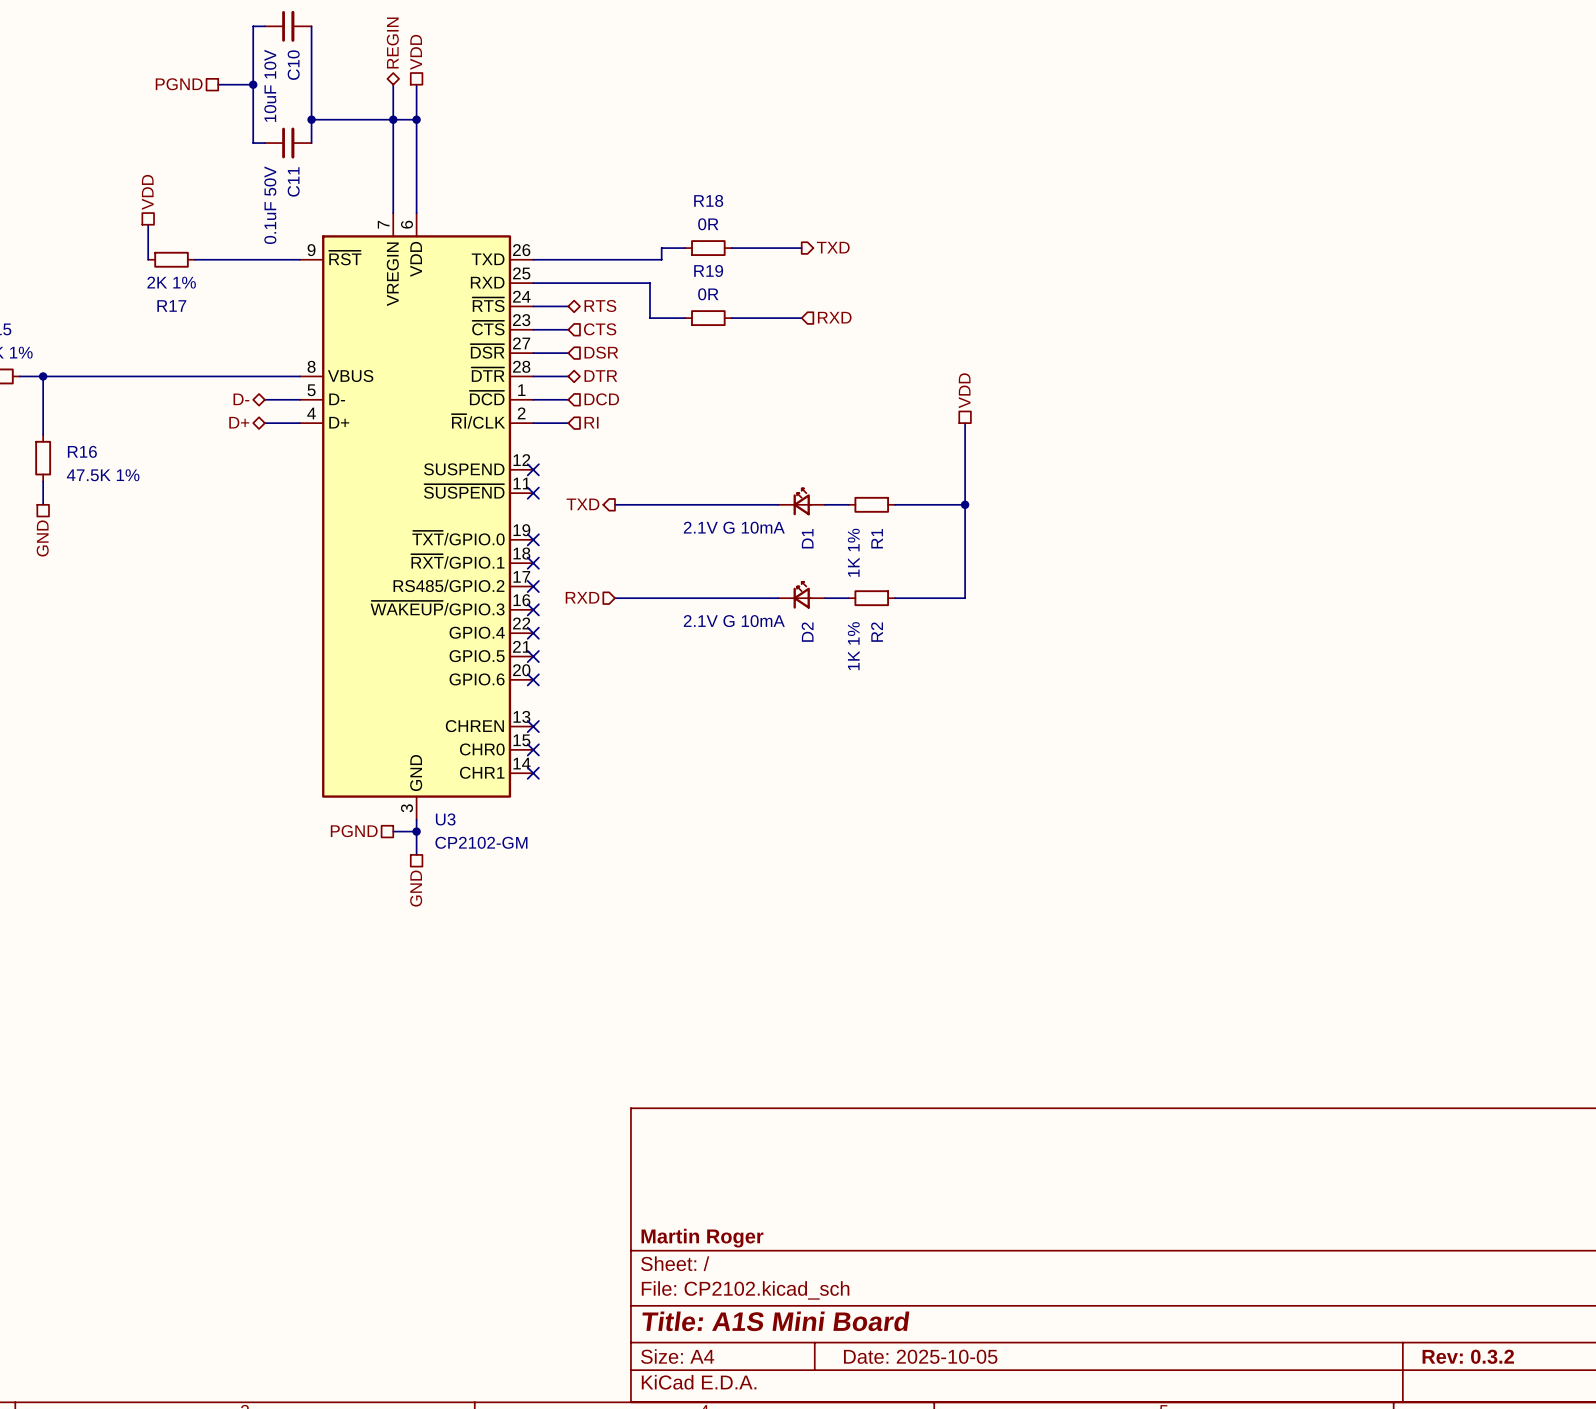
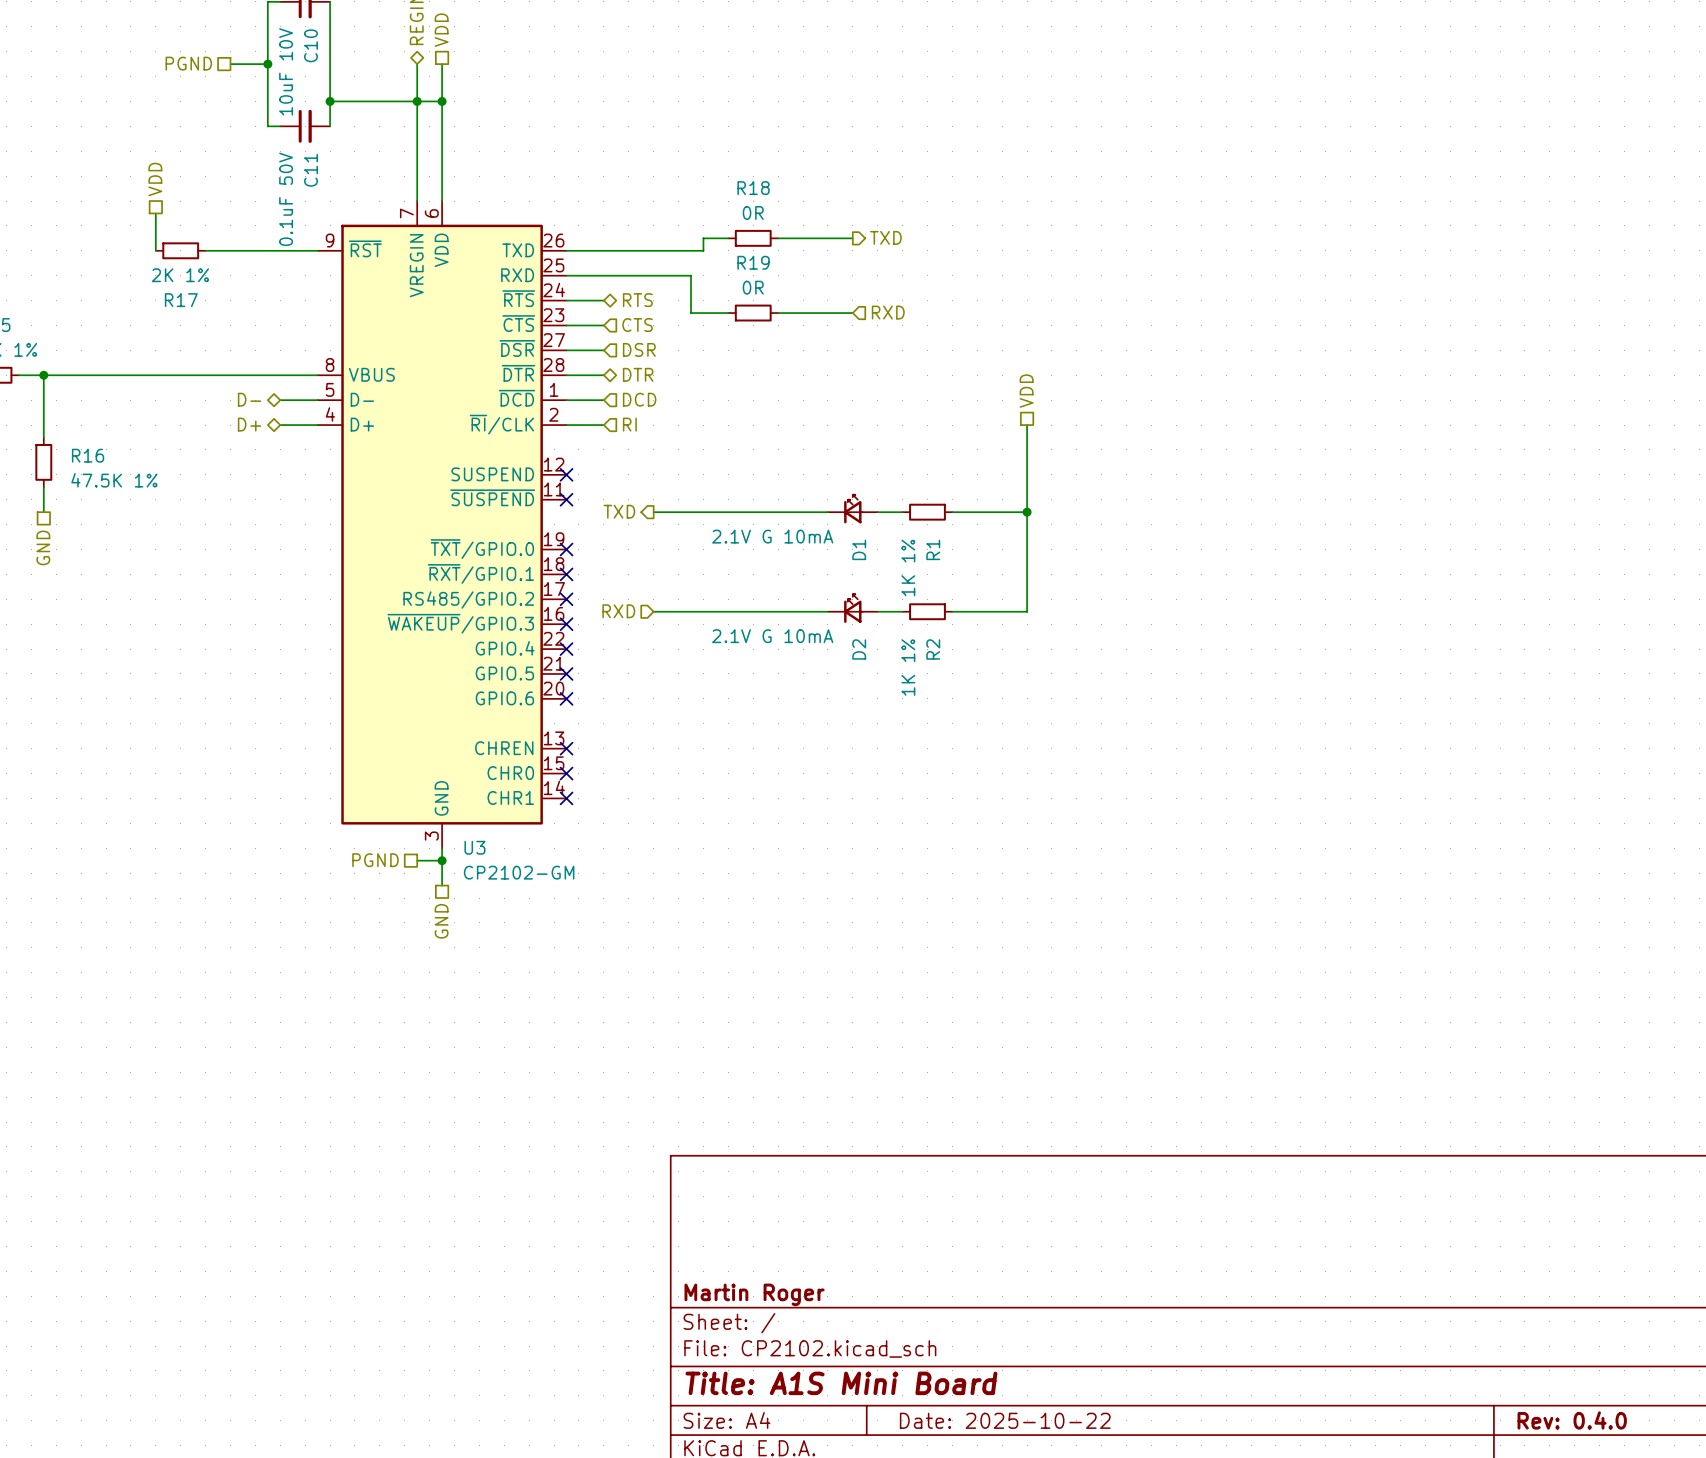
title block: Date: 2025-10-05 (920, 1356) -> Date: 2025-10-22 (1005, 1420)
title block: Rev: 0.3.2 (1468, 1356) -> Rev: 0.4.0 (1572, 1420)

